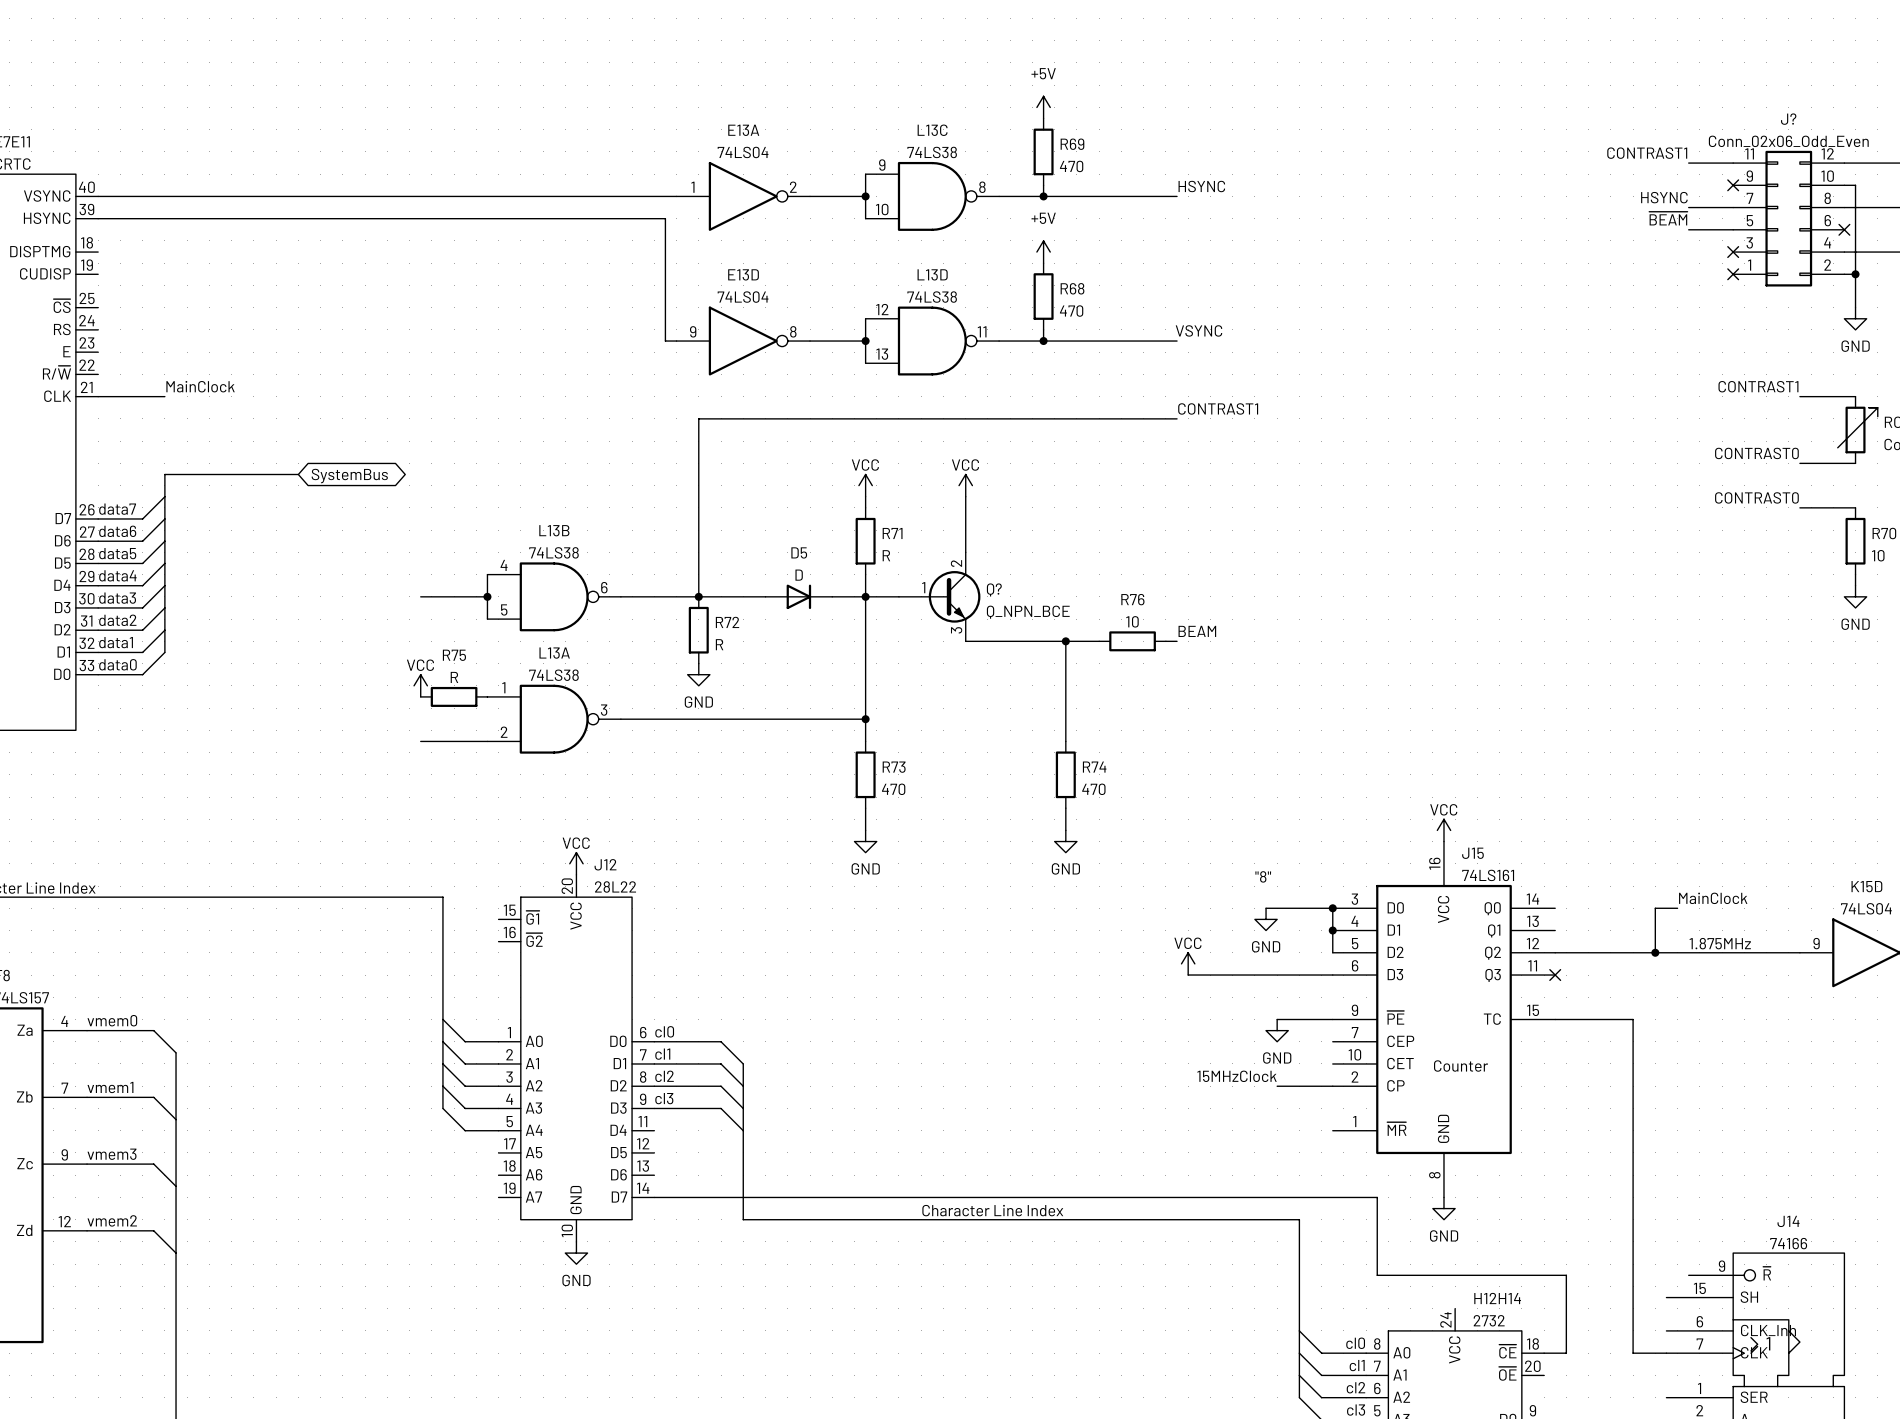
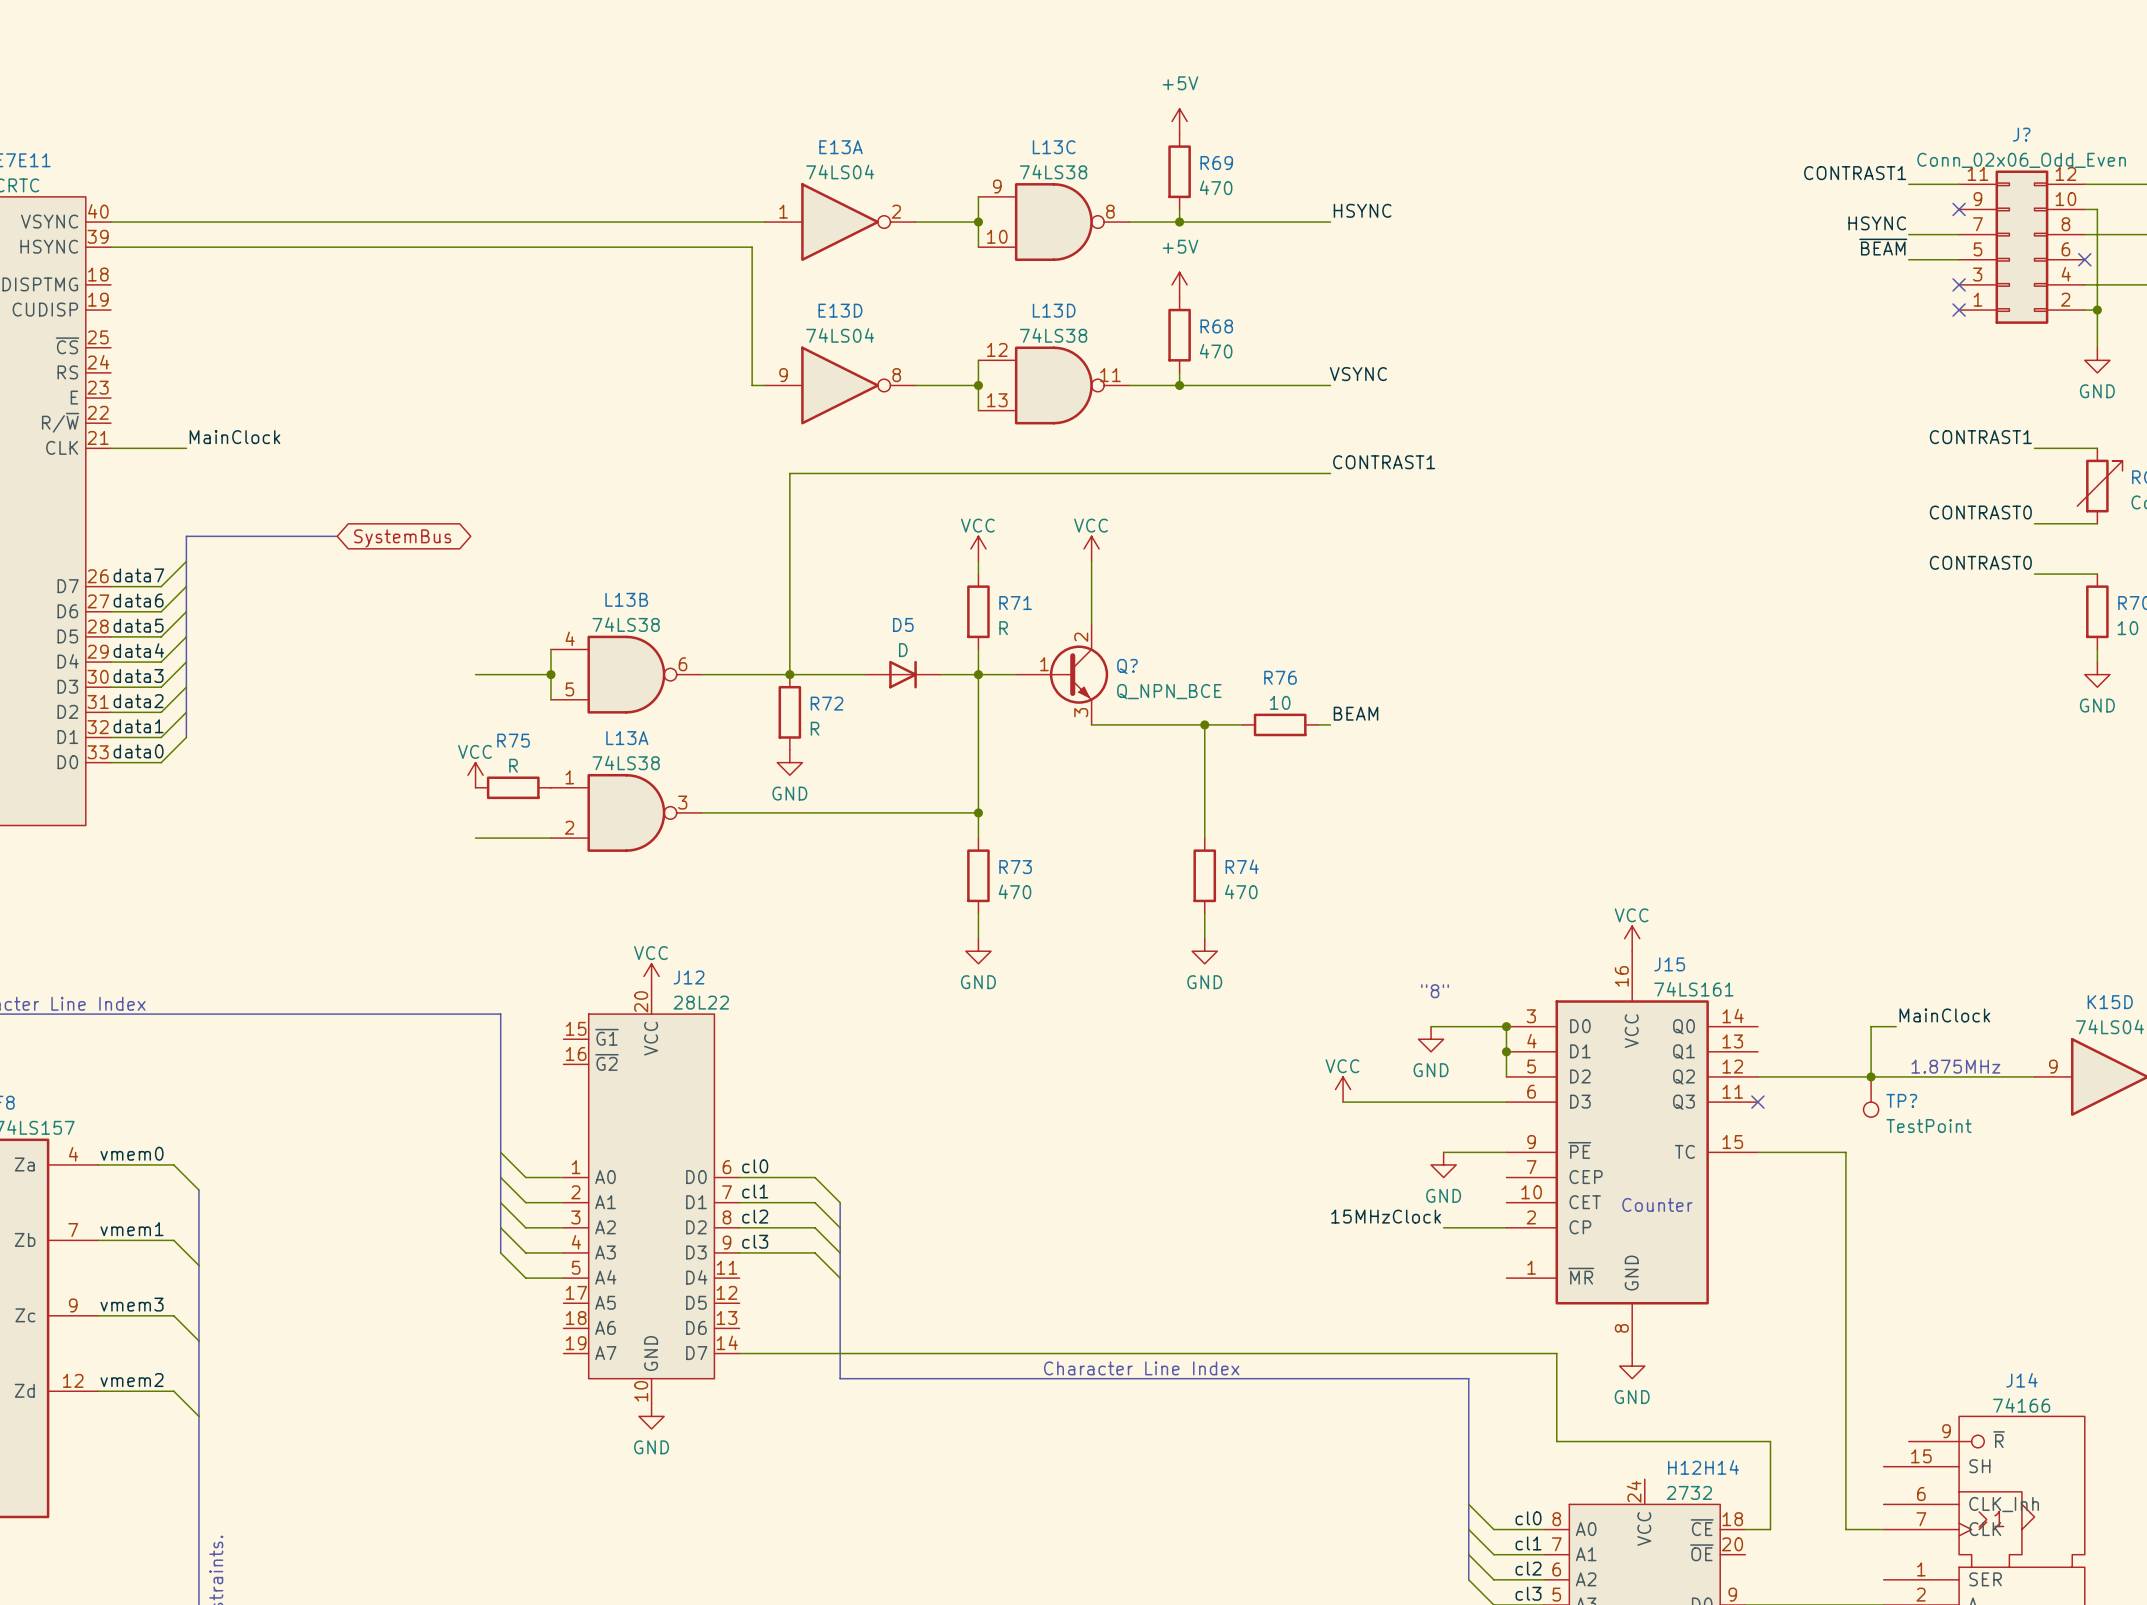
TP?: none -> TestPoint (1871, 1097)

